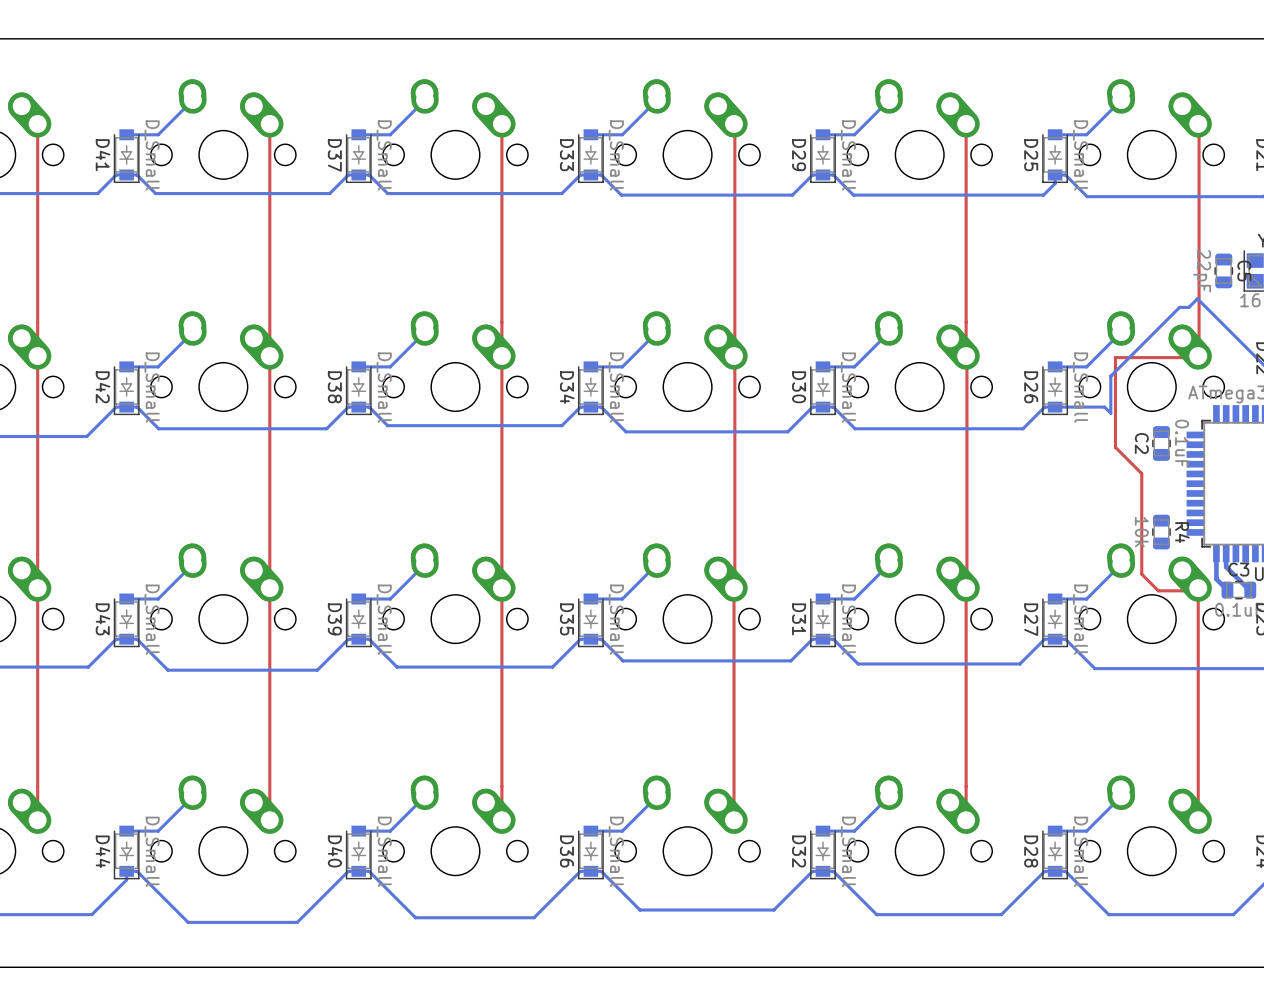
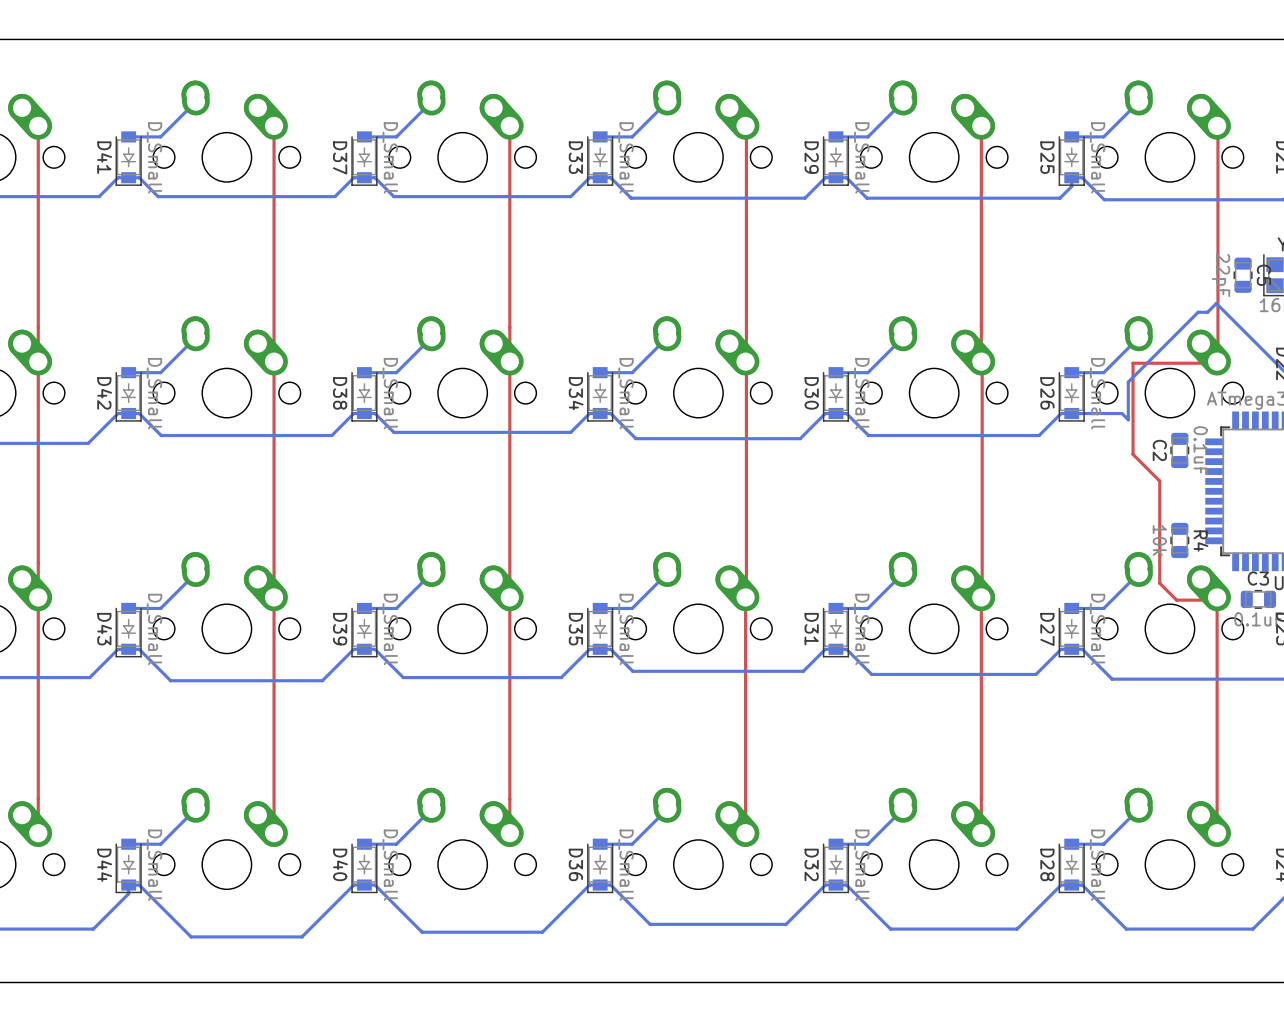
bottom track: (1216, 553) (1216, 579) (1227, 590) -> none
bottom track: (1226, 553) (1226, 566) (1250, 590) -> none

